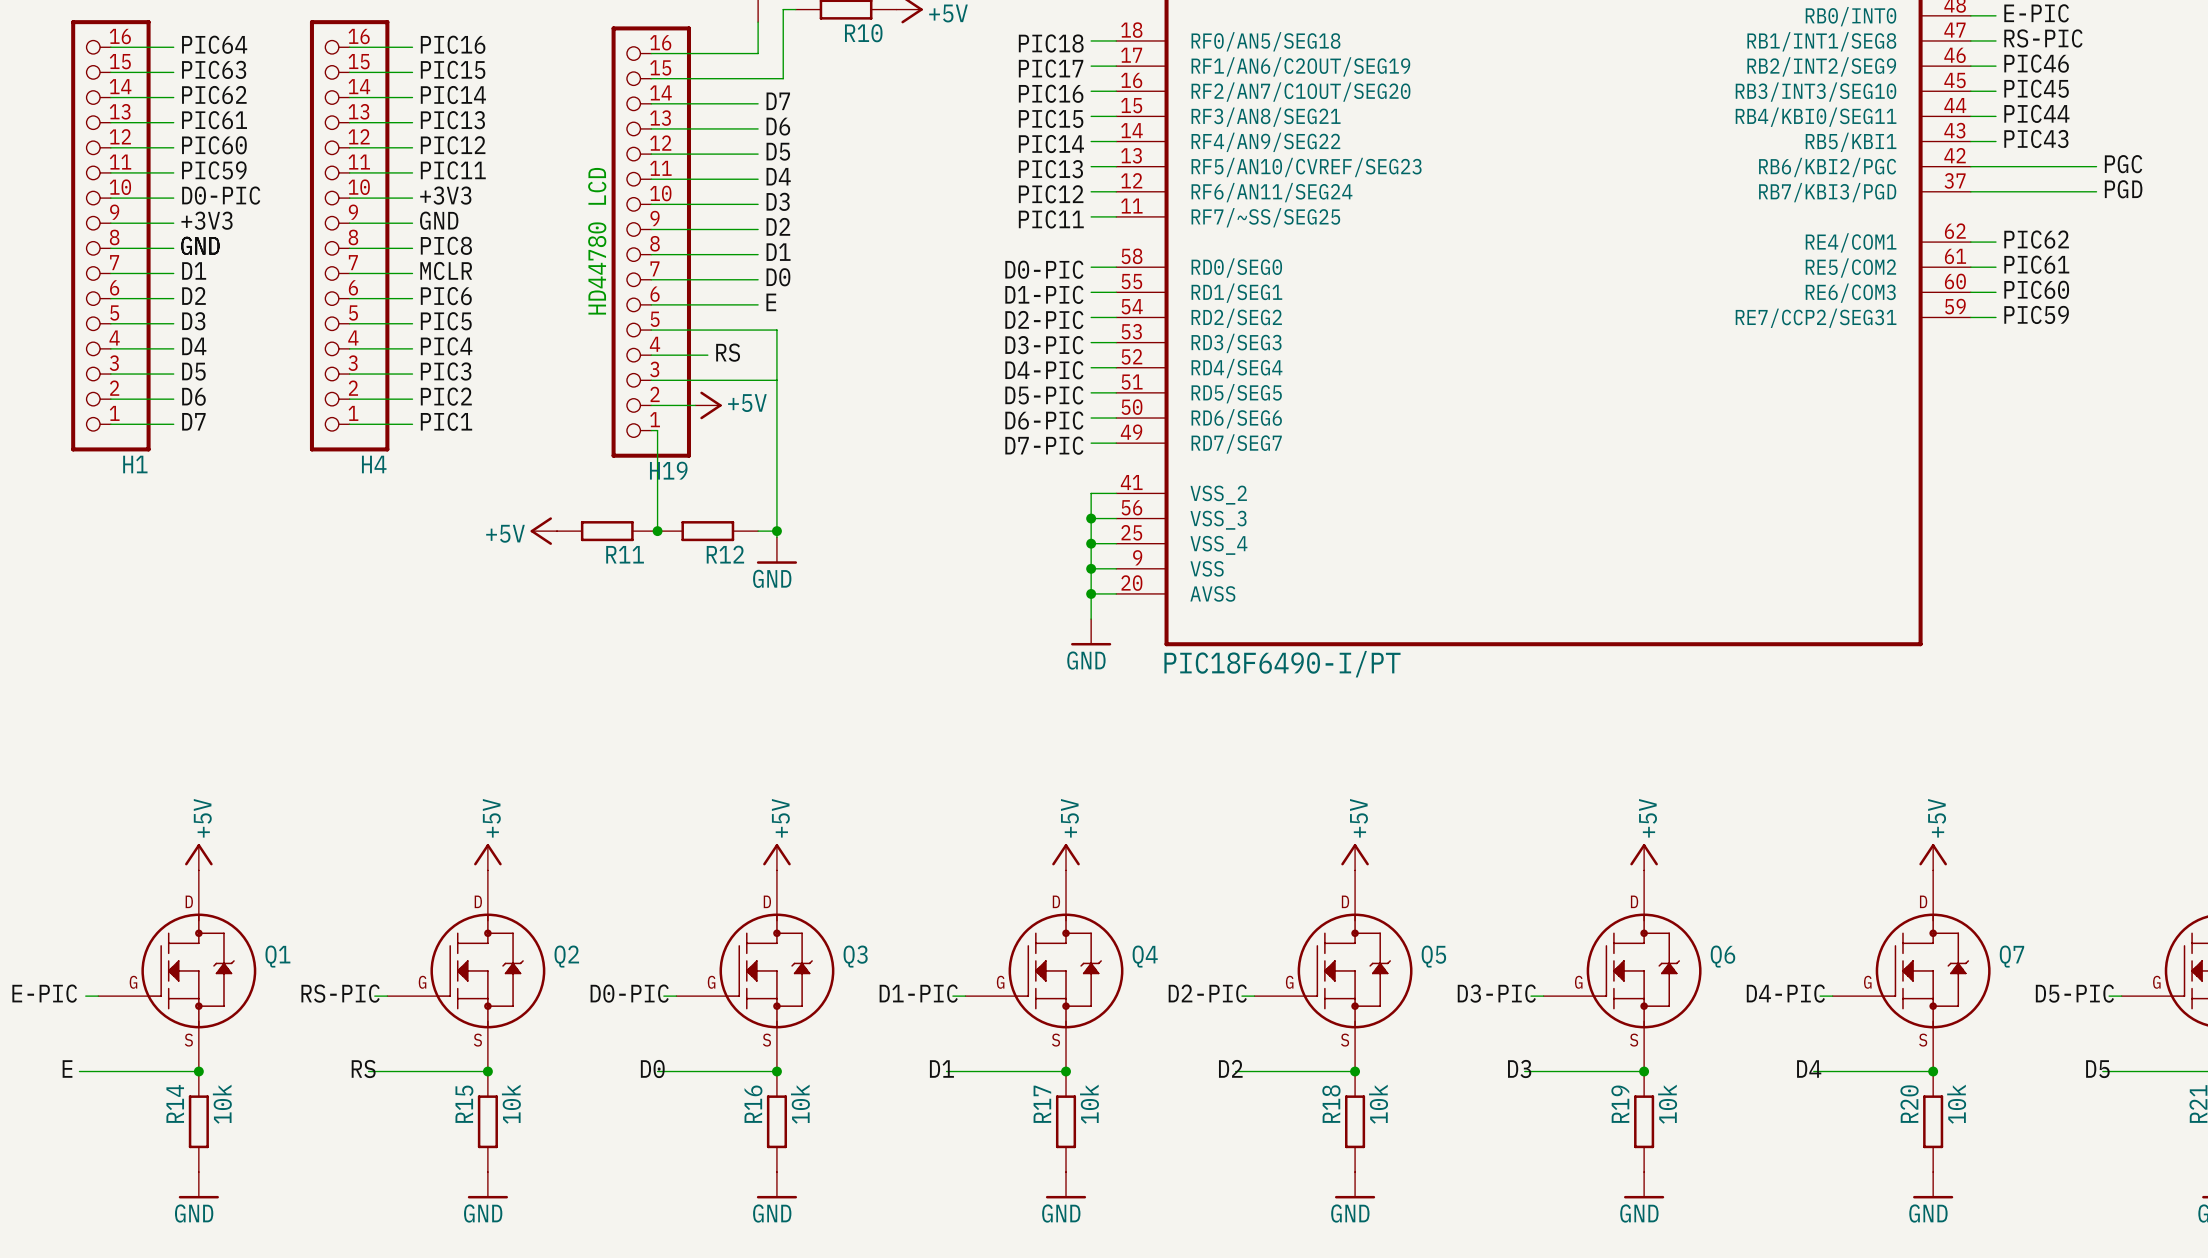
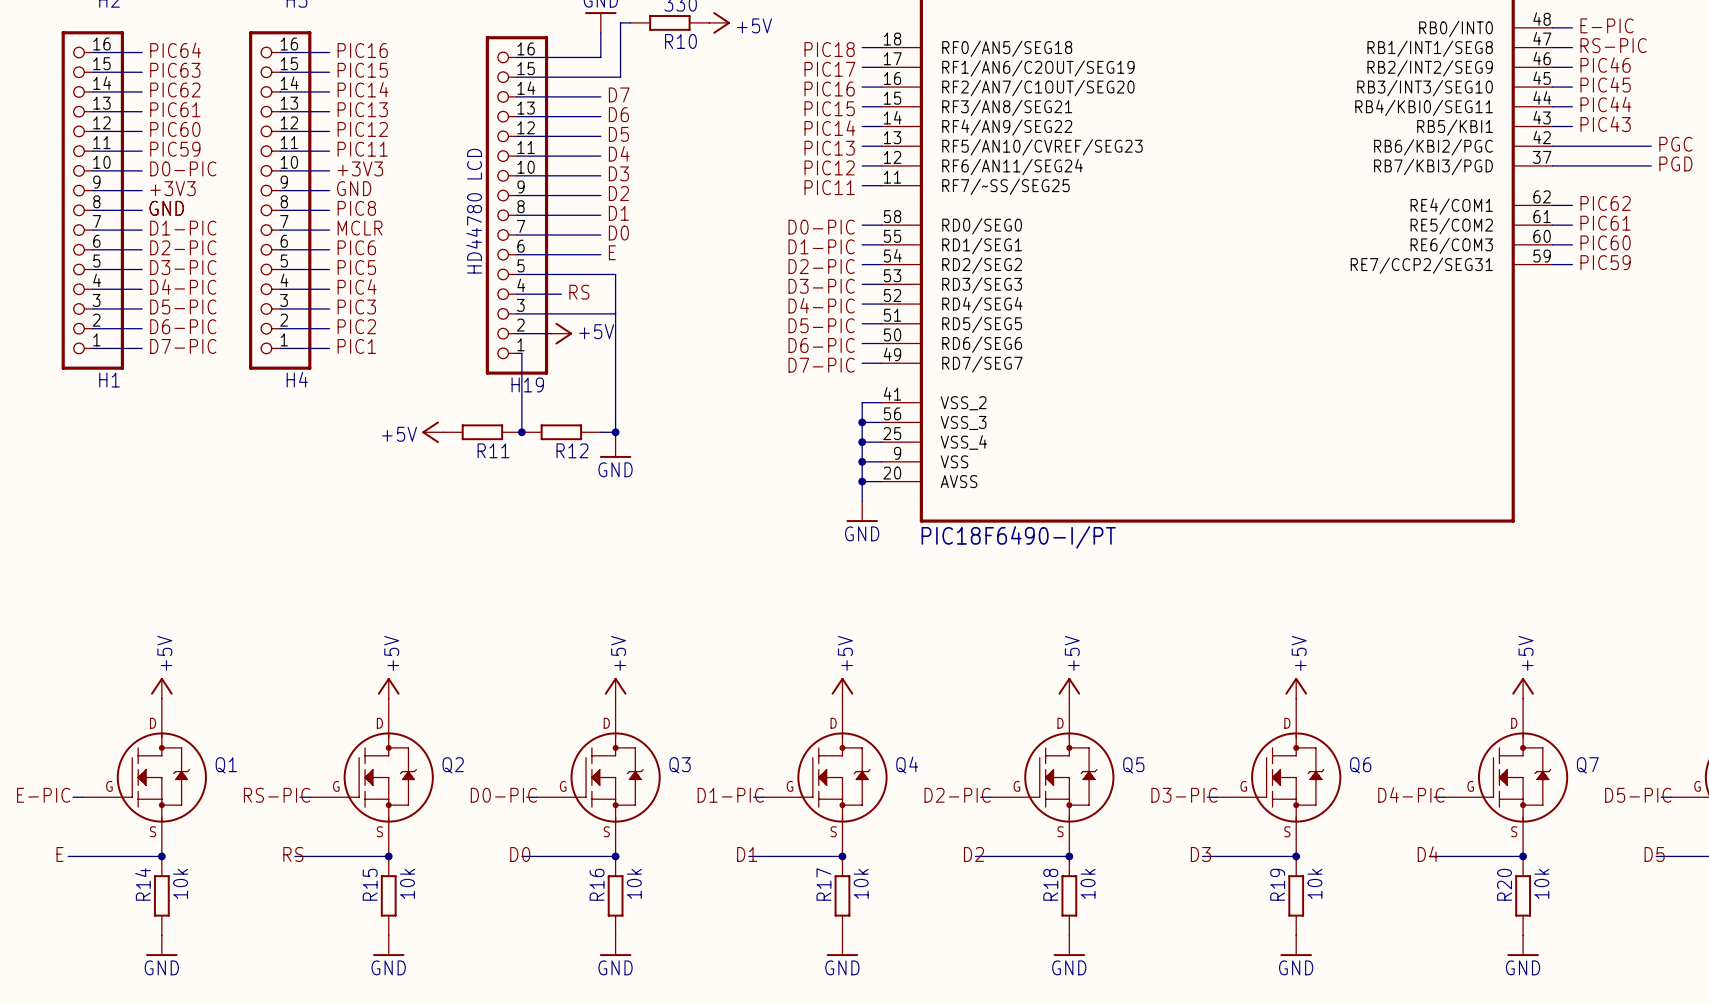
label: D1 (194, 270) -> D1-PIC (183, 228)
label: D2 (193, 295) -> D2-PIC (183, 247)
label: D3 (193, 321) -> D3-PIC (183, 267)
label: D4 (194, 346) -> D4-PIC (183, 286)
label: D5 (193, 371) -> D5-PIC (183, 307)
label: D6 (193, 396) -> D6-PIC (183, 326)
label: D7 (193, 421) -> D7-PIC (183, 346)

